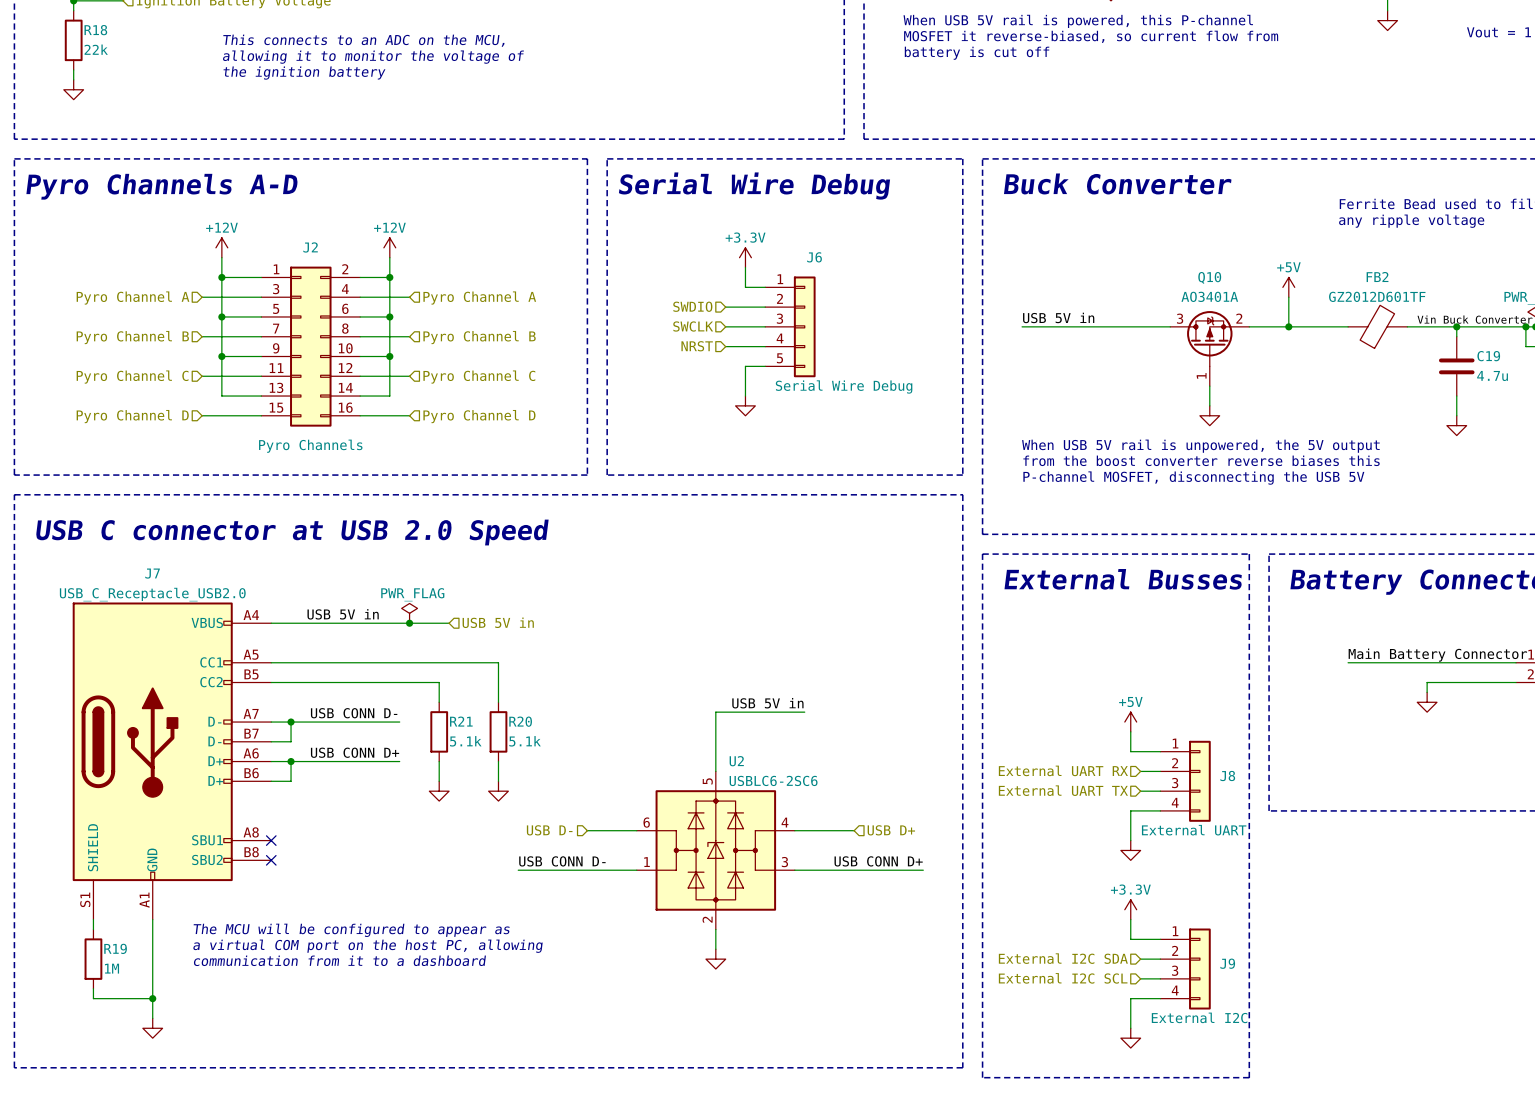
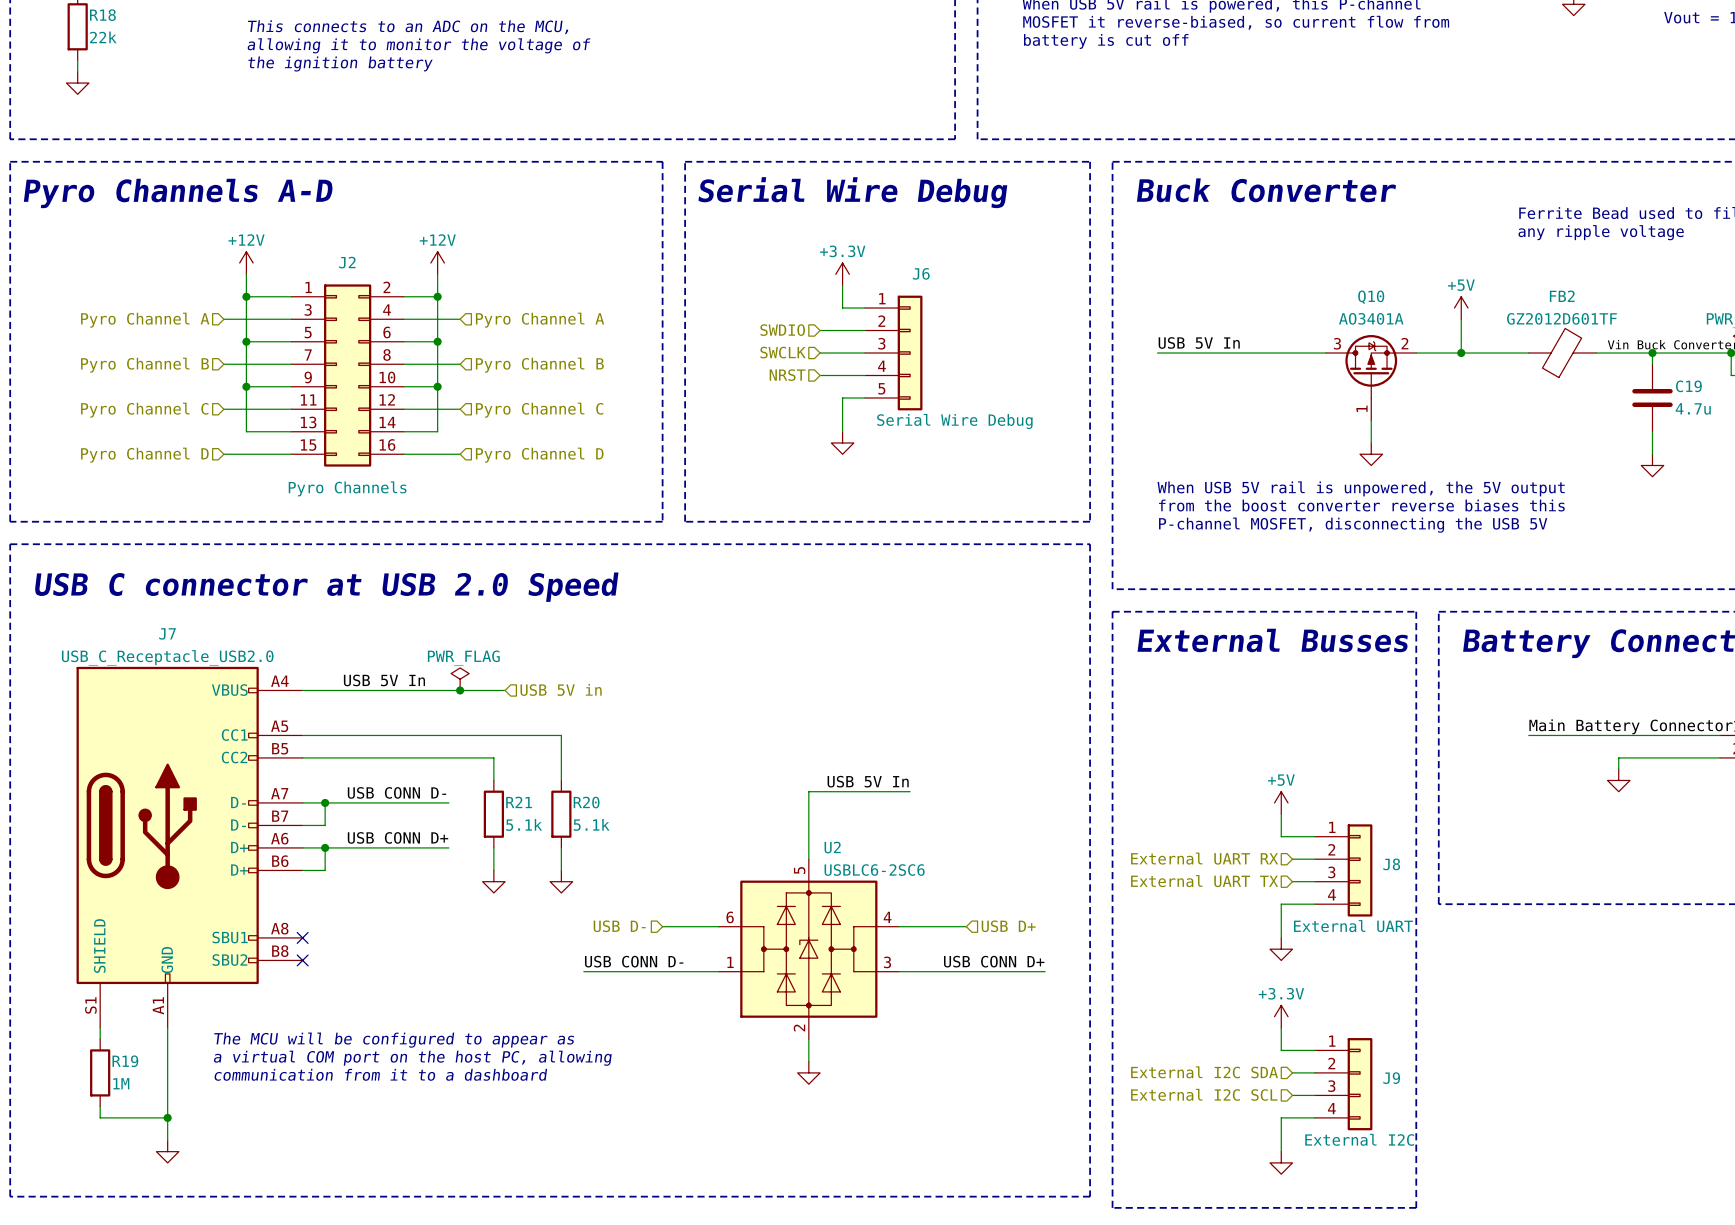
label: USB 5V in (1058, 317) -> USB 5V In (1199, 342)
label: USB 5V in (343, 614) -> USB 5V In (384, 680)
label: USB 5V in (767, 703) -> USB 5V In (868, 781)

